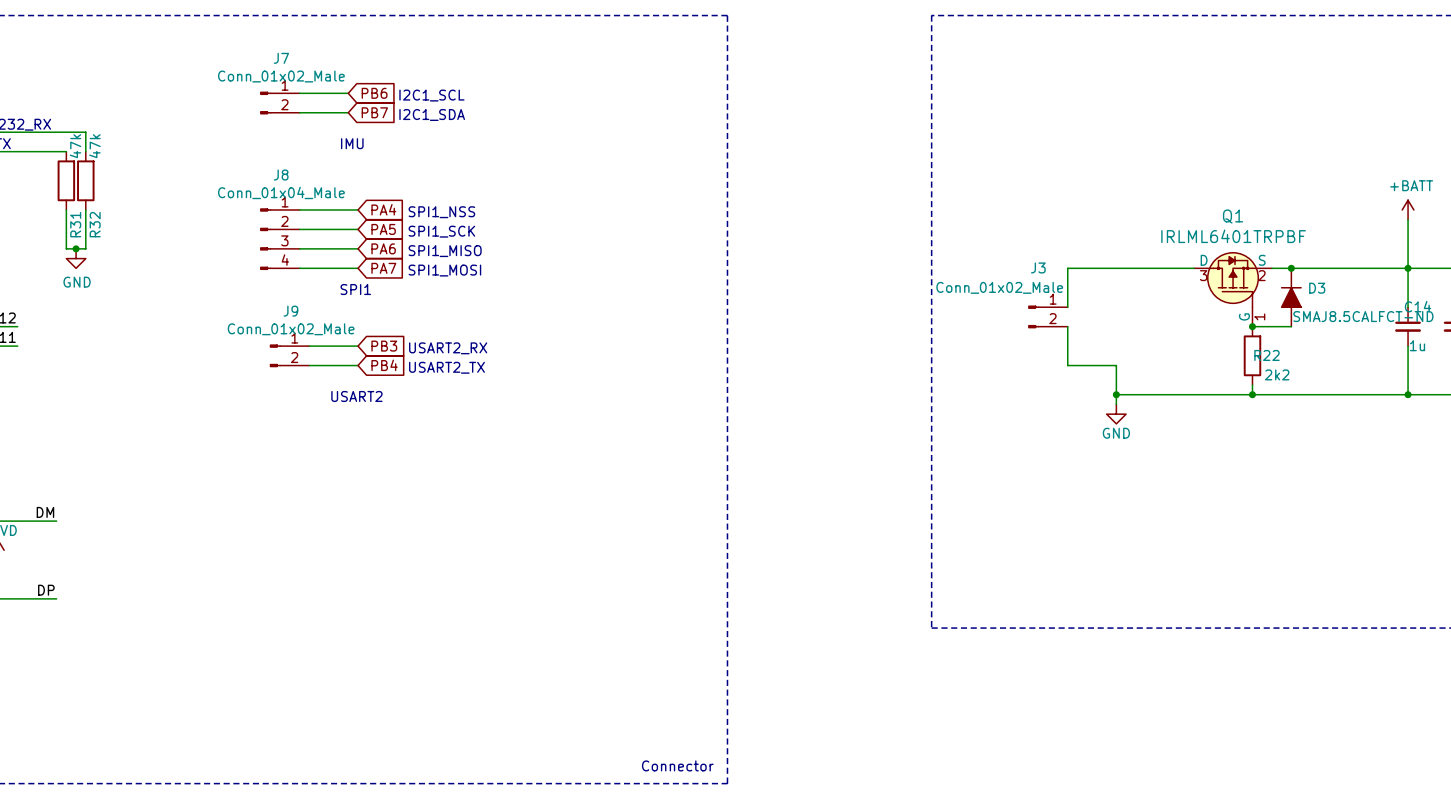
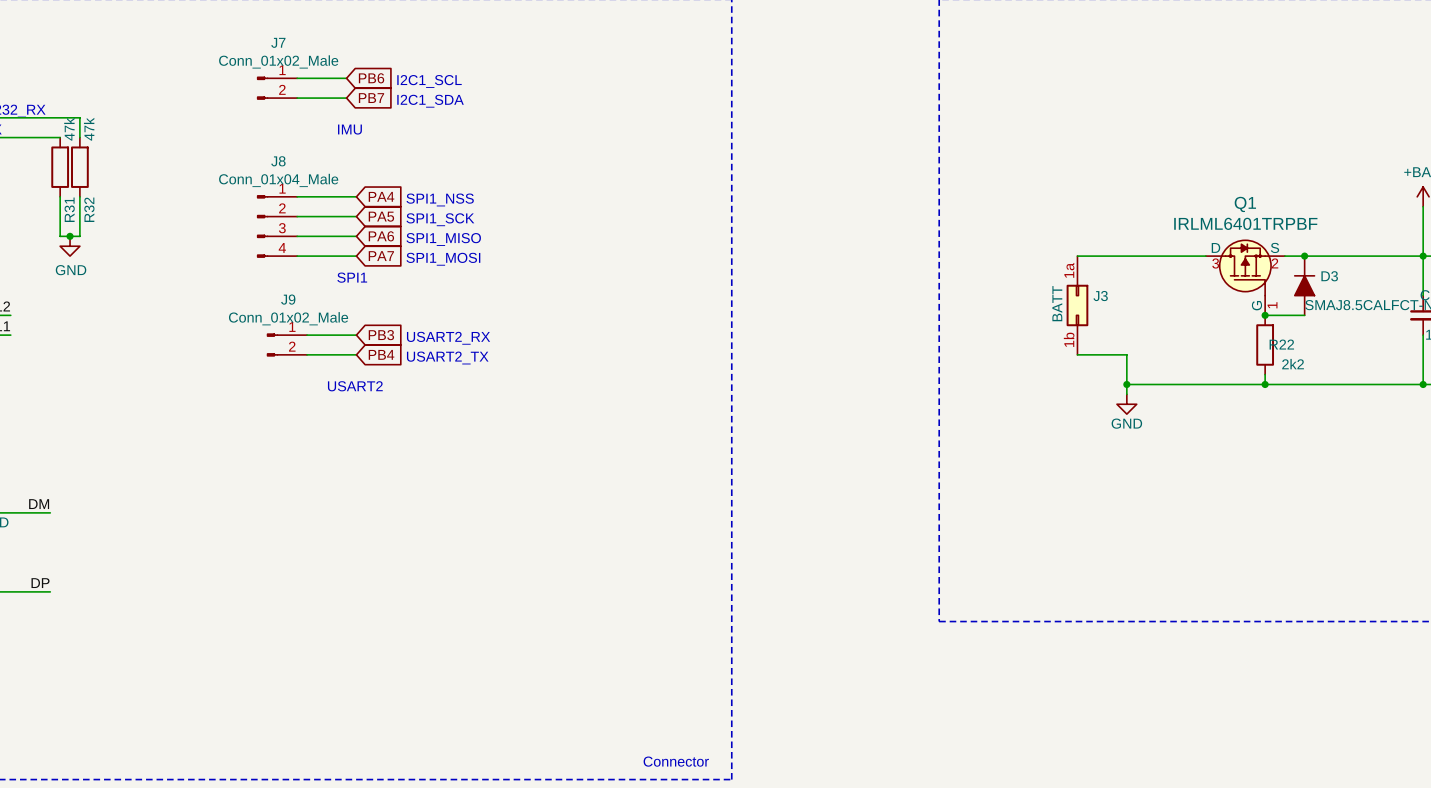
J3 name position: J3 (1038, 267) -> J3 (1100, 296)
J3 value: Conn_01x02_Male (999, 287) -> BATT (1057, 303)
J3 symbol: [1028, 305, 1068, 329] -> [1066, 256, 1089, 355]

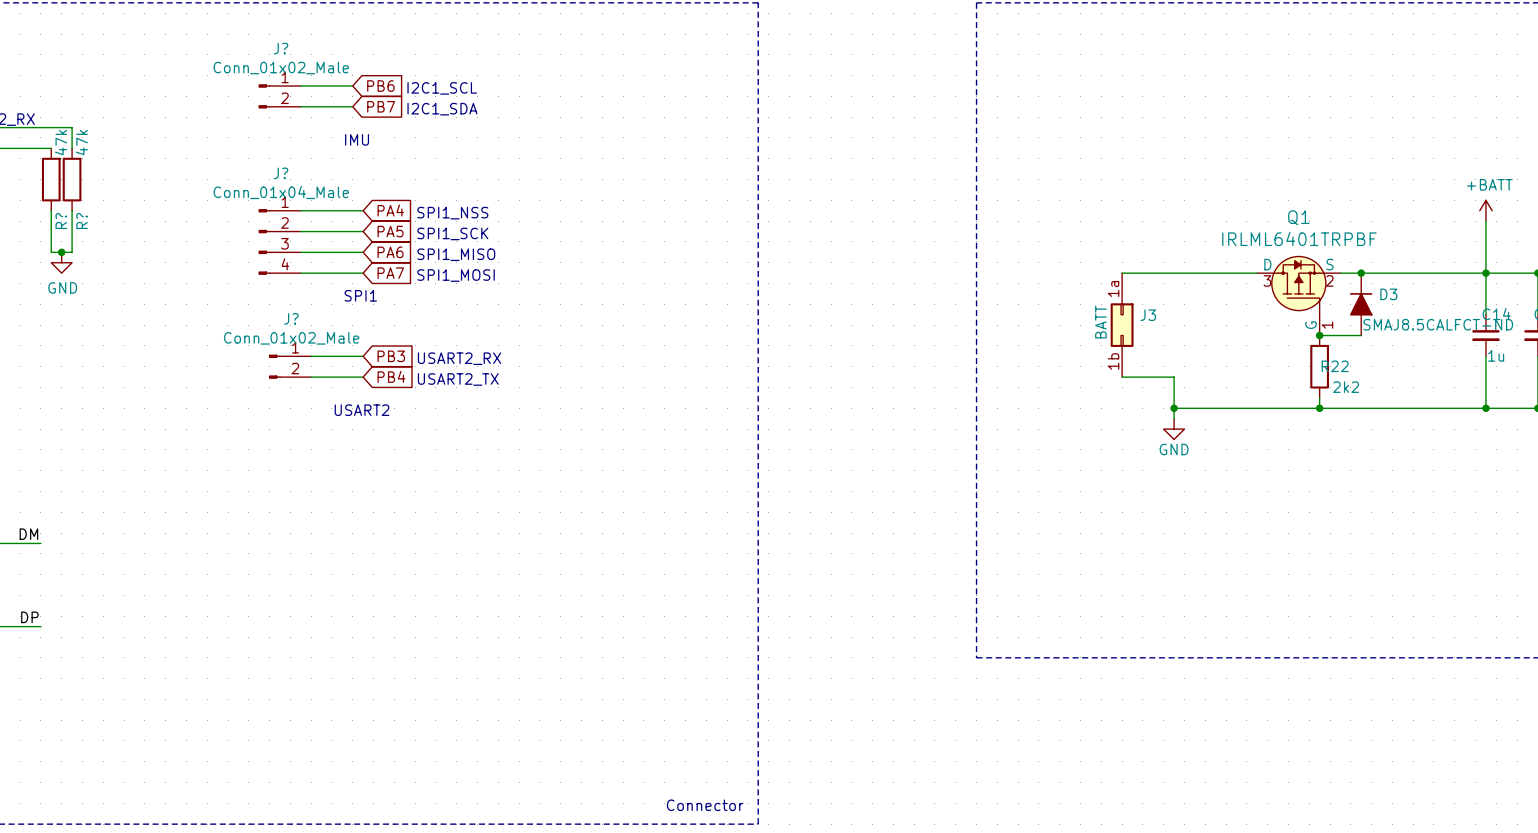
J7 name: J7 (278, 42) -> J? (280, 48)
J8 name: J8 (278, 161) -> J? (280, 173)
R31 name: R31 (69, 209) -> R? (61, 221)
R32 name: R32 (89, 209) -> R? (82, 221)
J9 name: J9 (288, 299) -> J? (291, 318)

